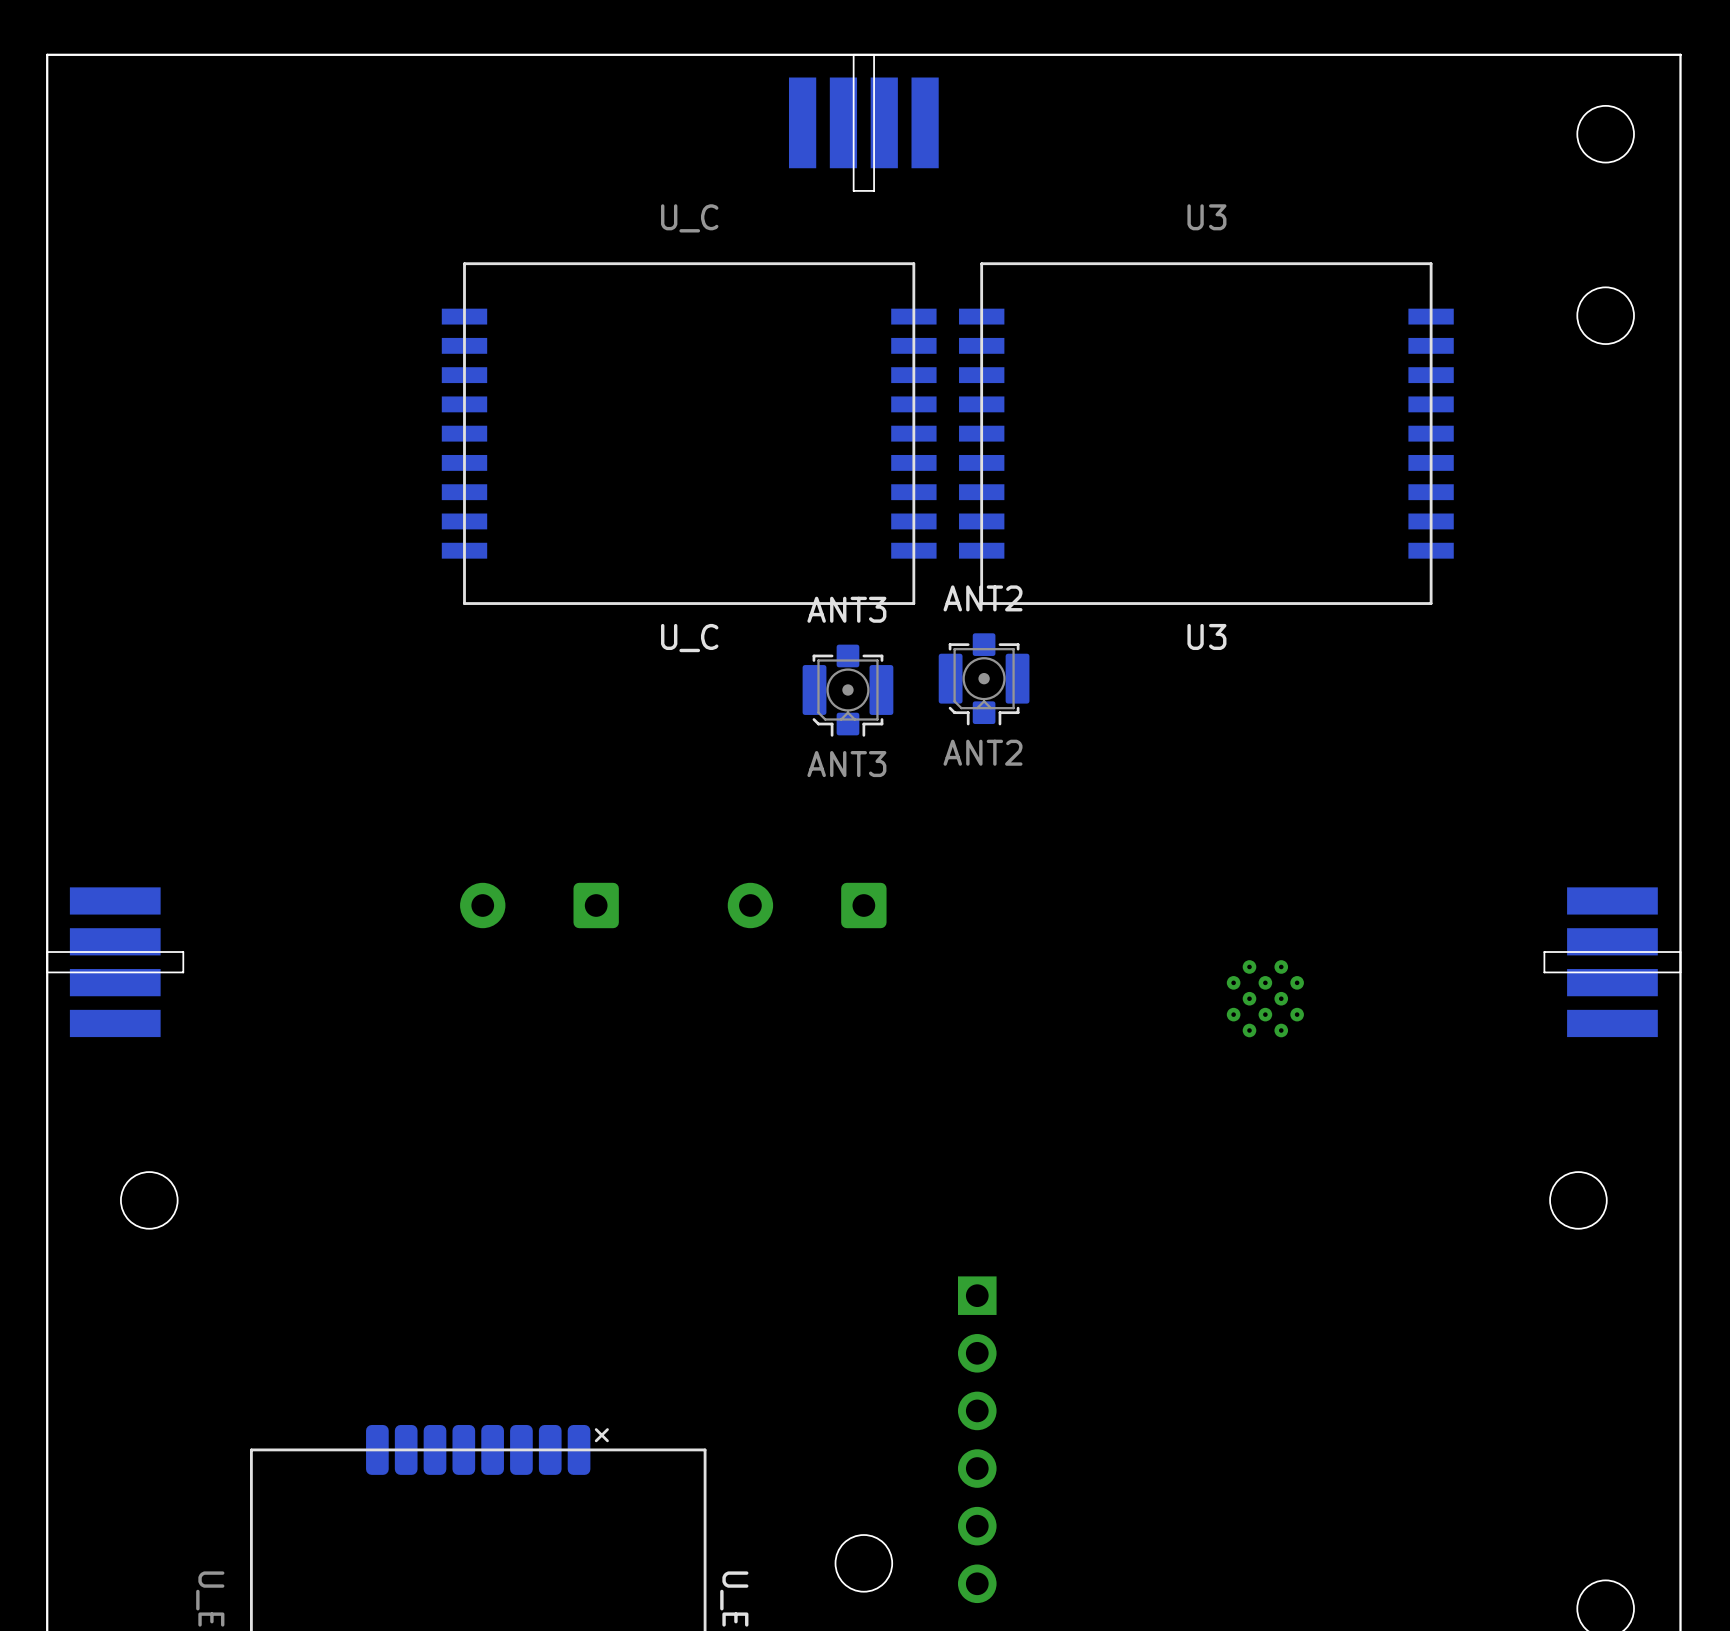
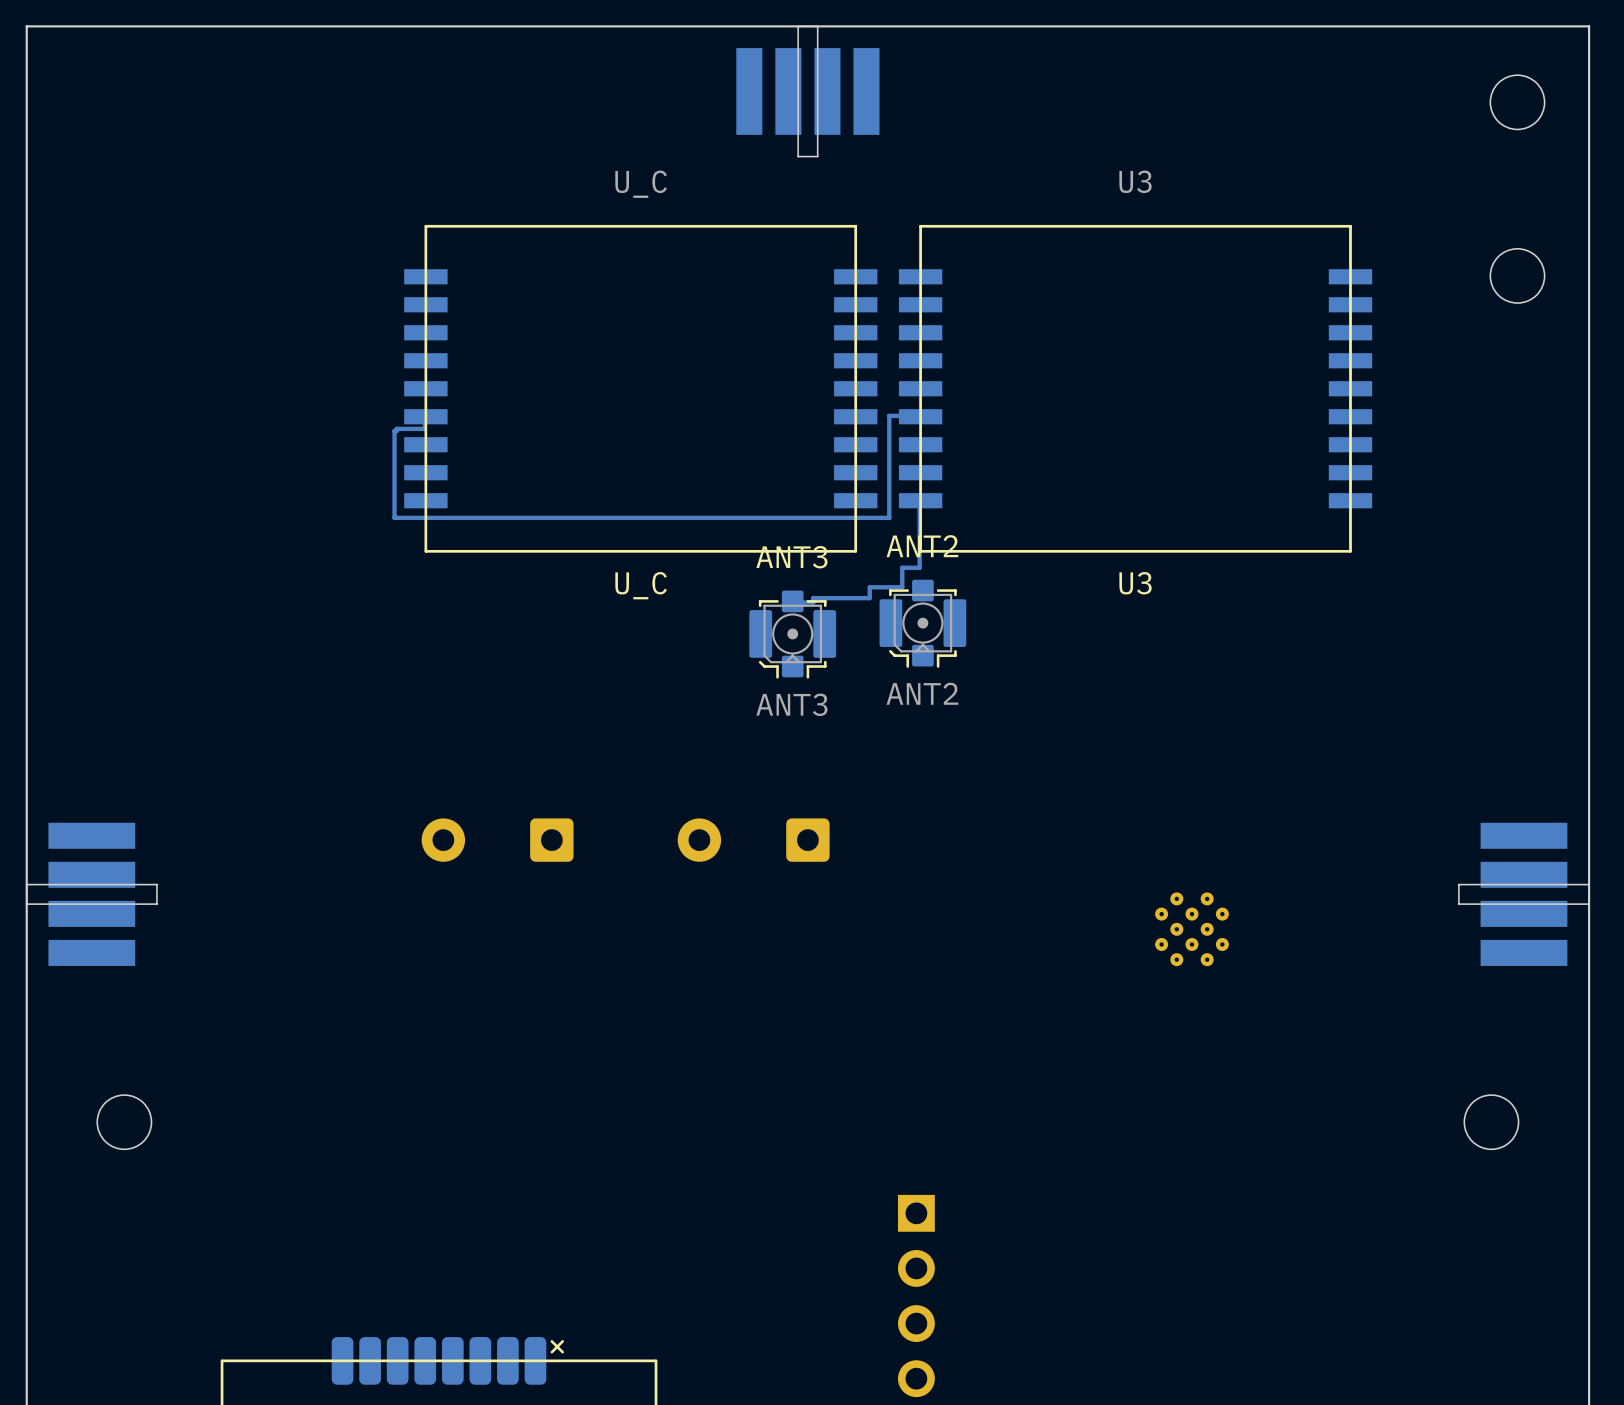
track: none -> (919, 415) (889, 415) (889, 517) (394, 517) (394, 431) (396, 431) (396, 428) (424, 428) (424, 415)
track: none -> (919, 500) (919, 567) (902, 567) (902, 587) (869, 587) (869, 598) (813, 598) (813, 602) (791, 602)

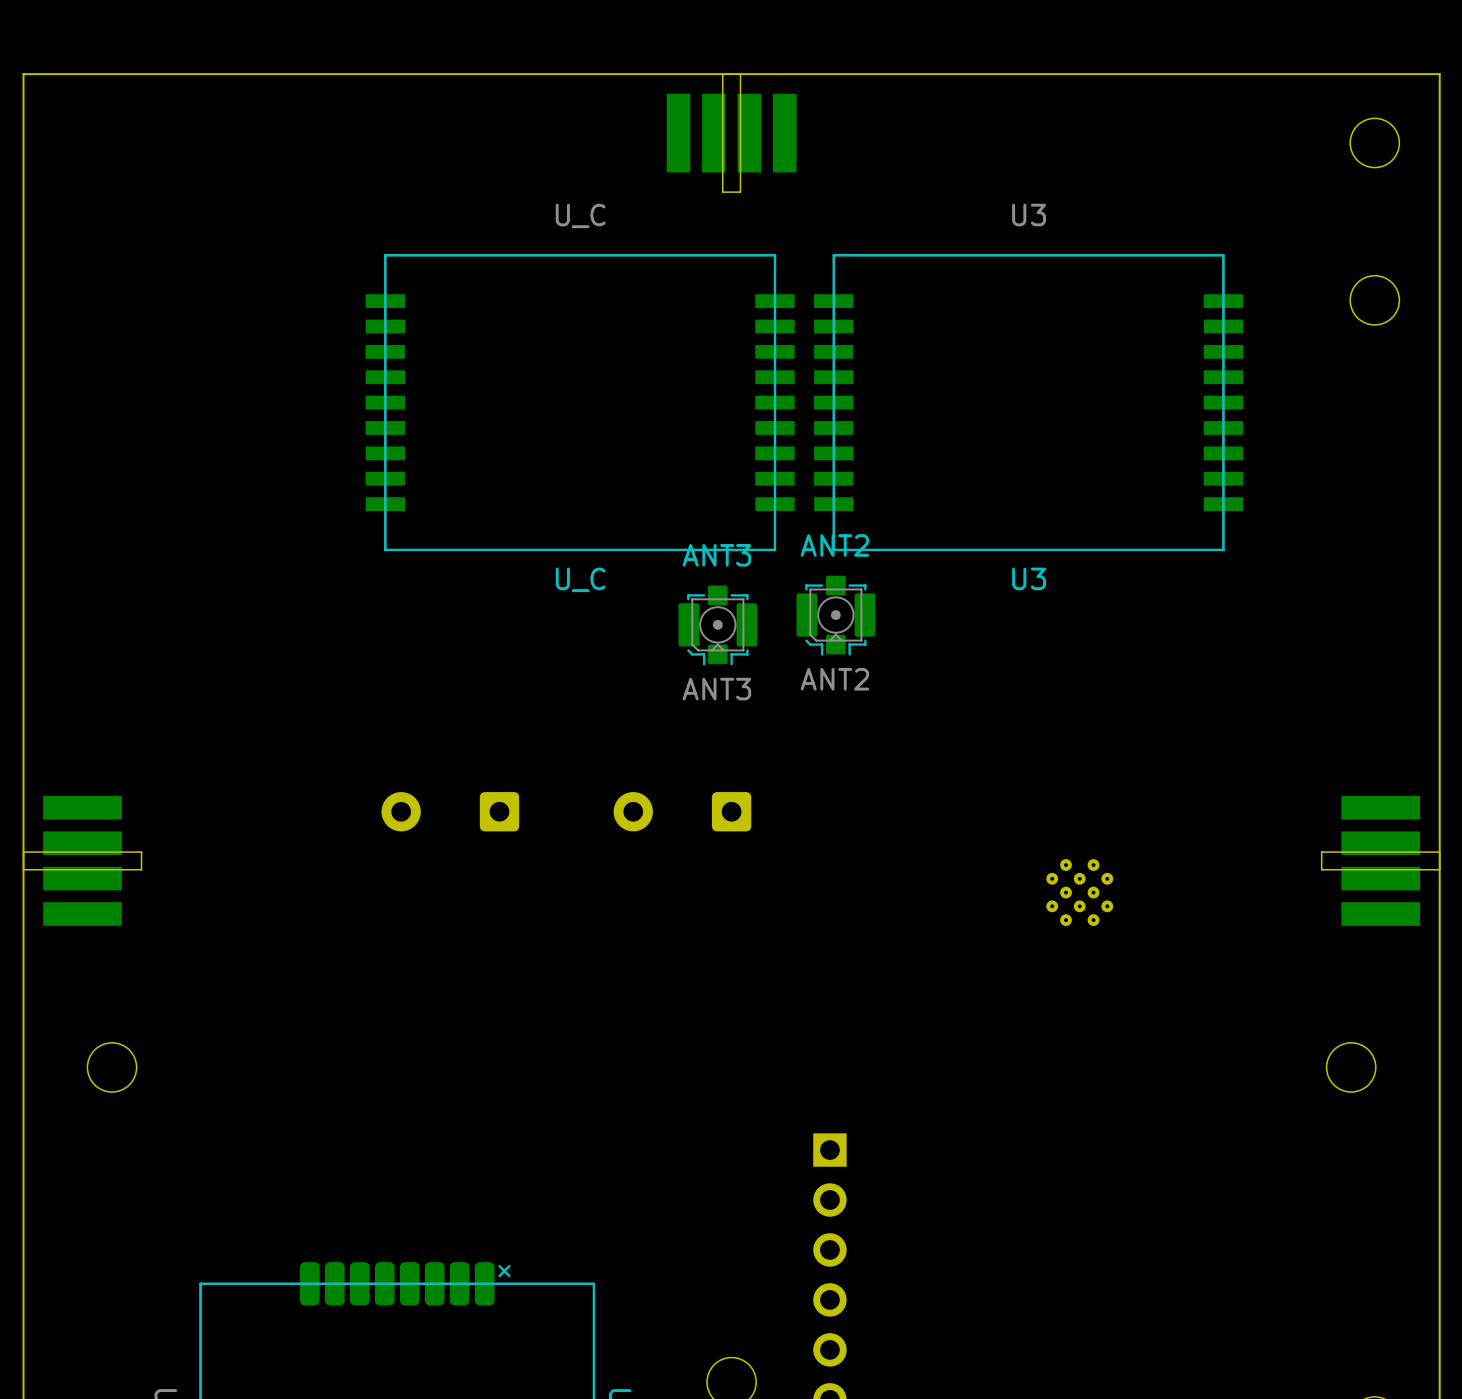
track: (919, 415) (889, 415) (889, 517) (394, 517) (394, 431) (396, 431) (396, 428) (424, 428) (424, 415) -> none
track: (919, 500) (919, 567) (902, 567) (902, 587) (869, 587) (869, 598) (813, 598) (813, 602) (791, 602) -> none

